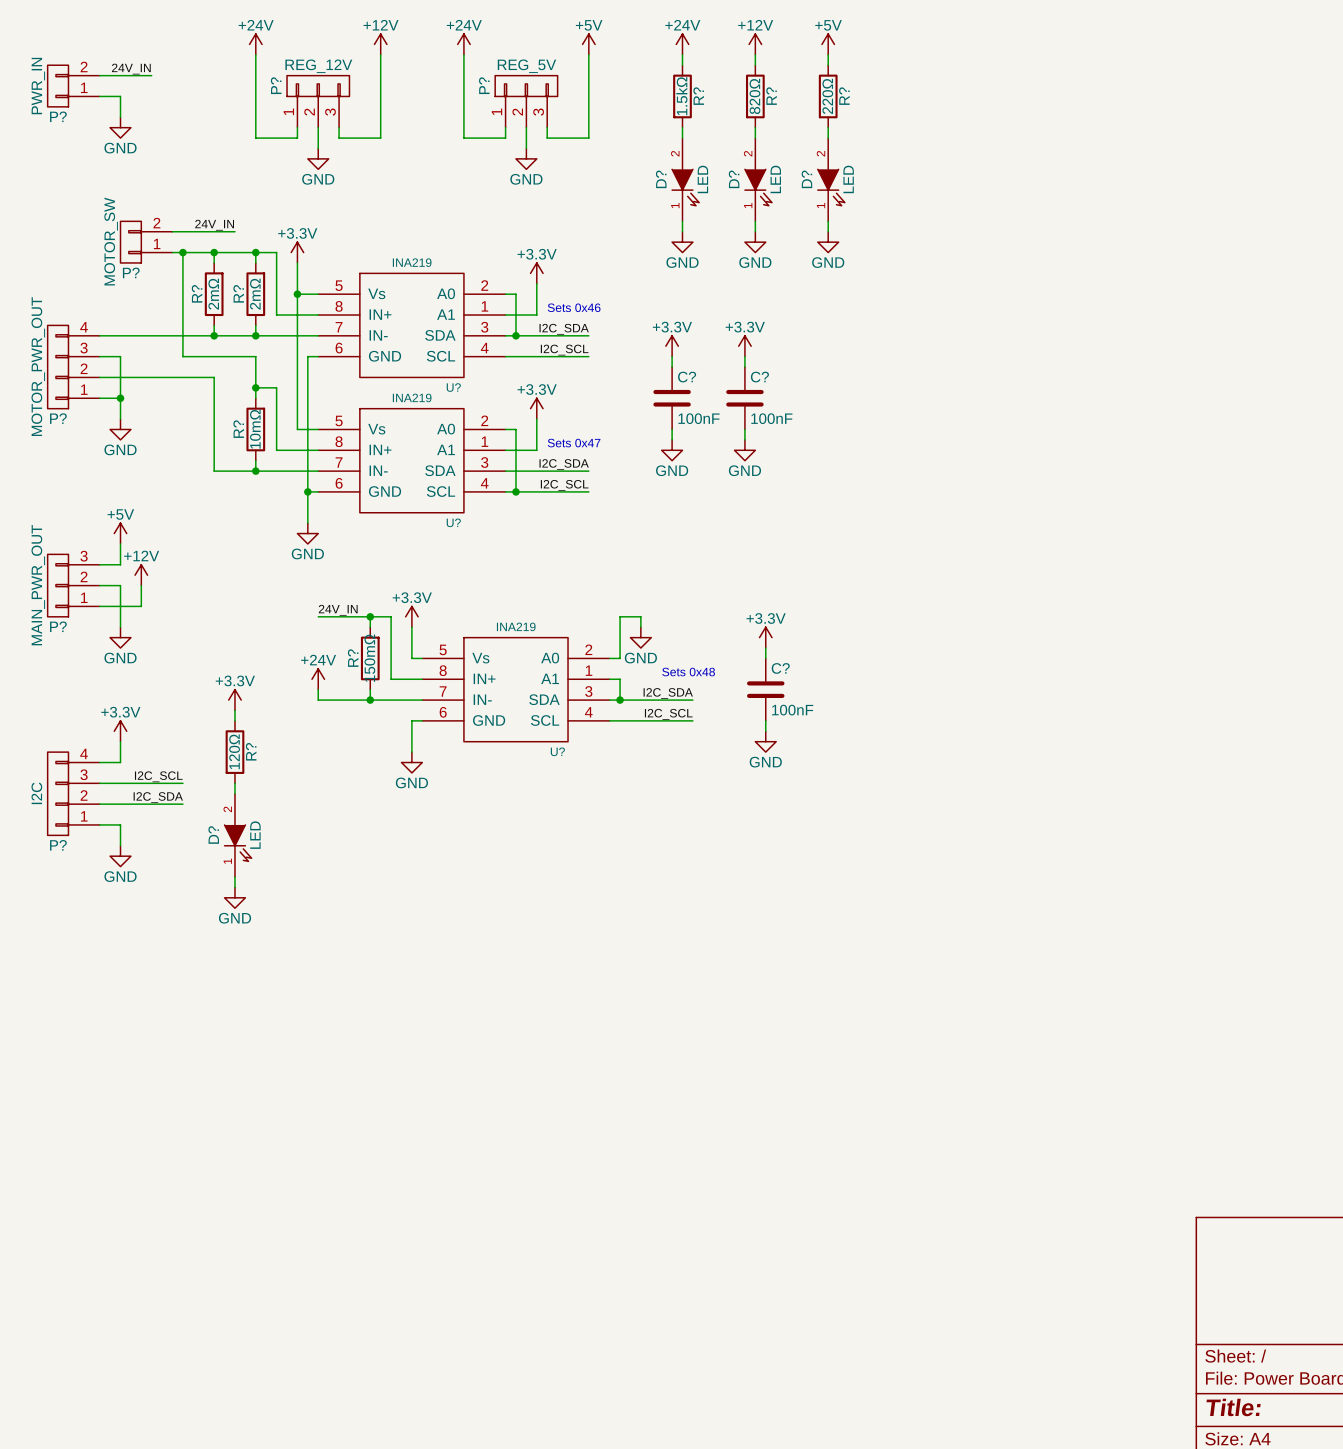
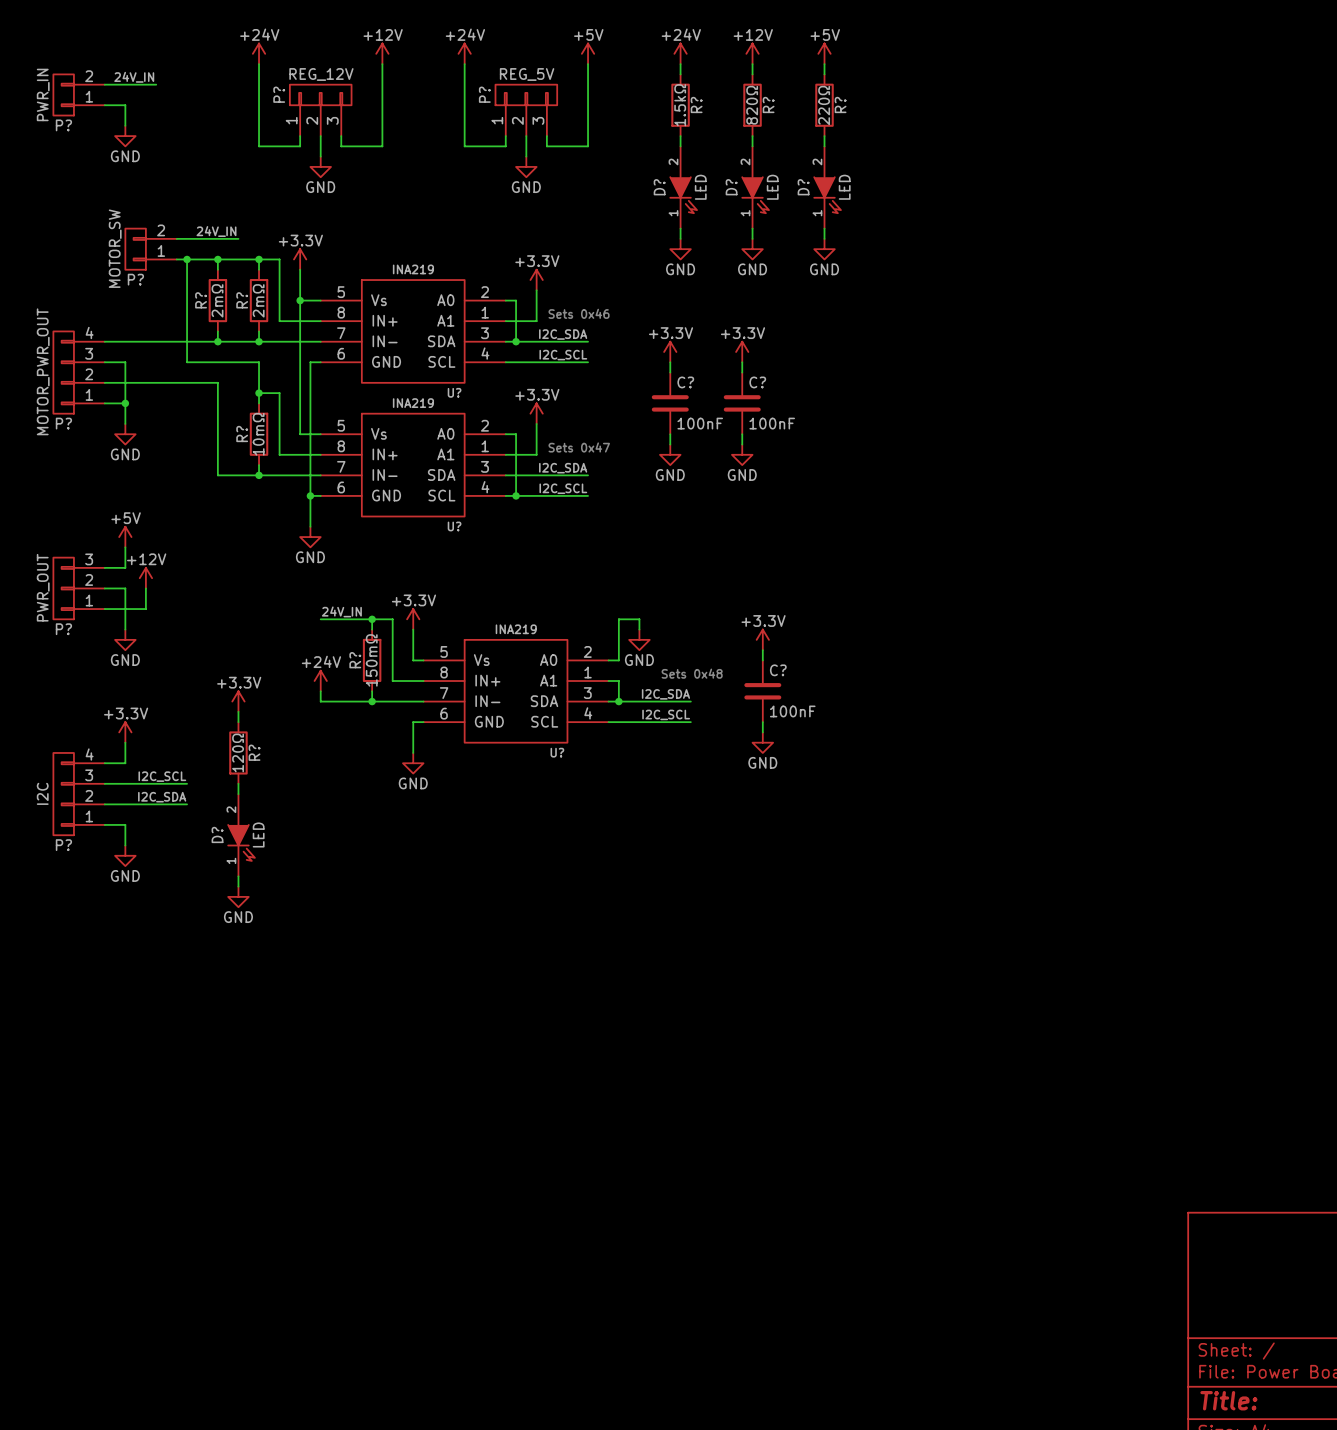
P? value: MAIN_PWR_OUT (38, 585) -> PWR_OUT (43, 587)

